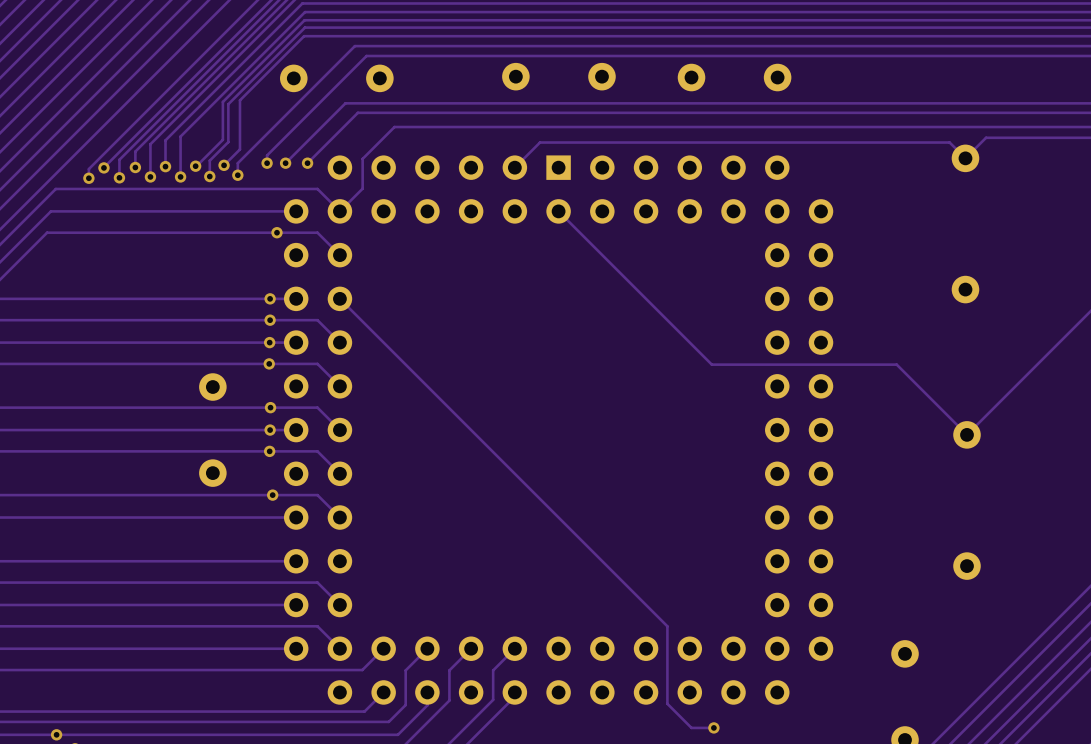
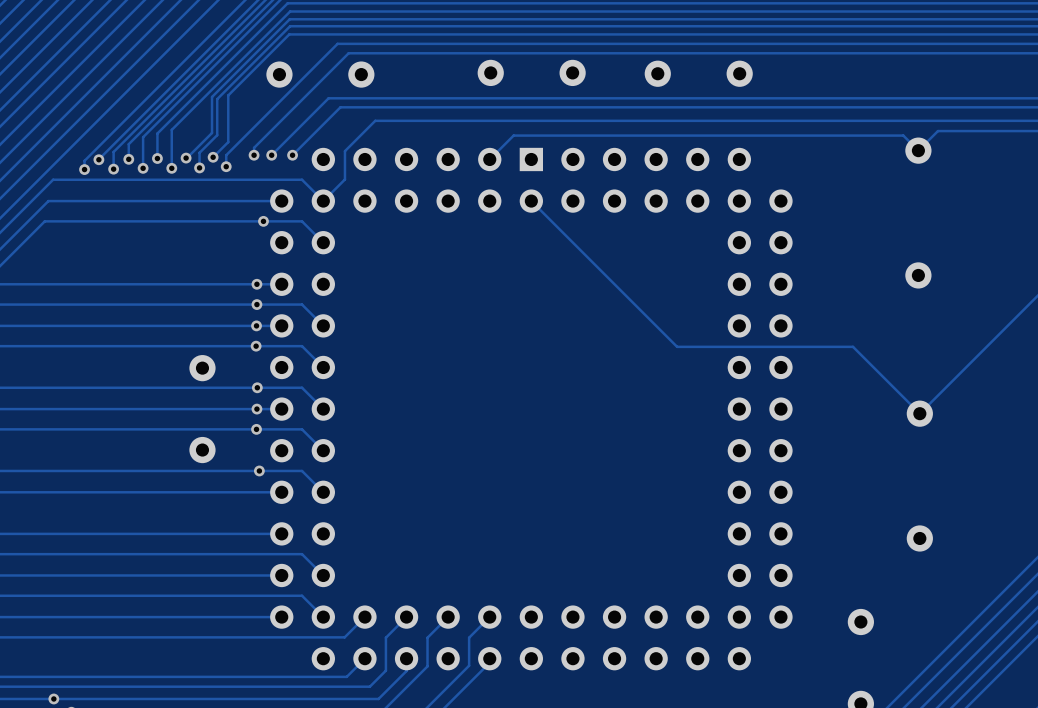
track: (339, 298) (667, 626) (667, 703) (691, 727) (713, 727) -> none
via: (713, 727) -> none

